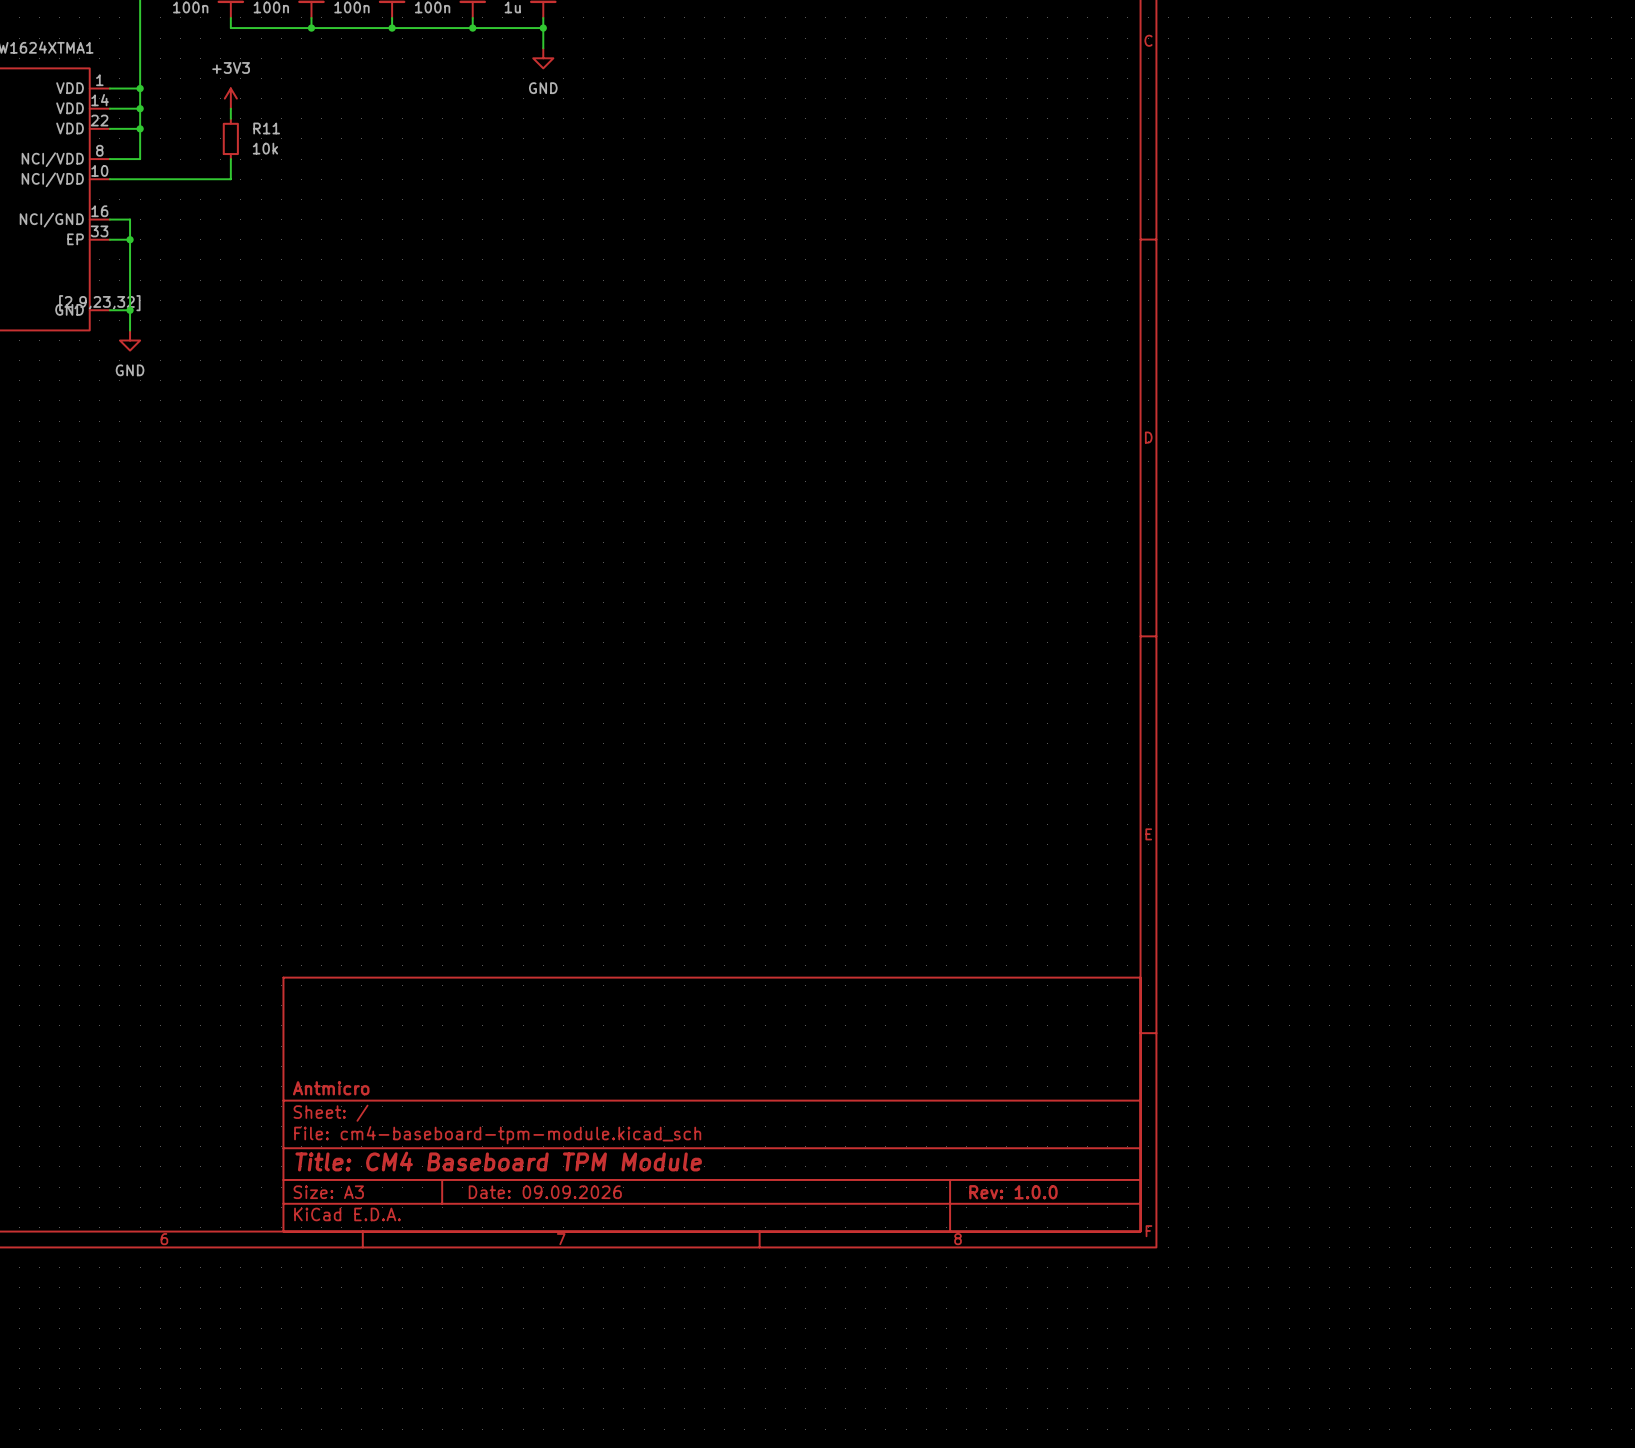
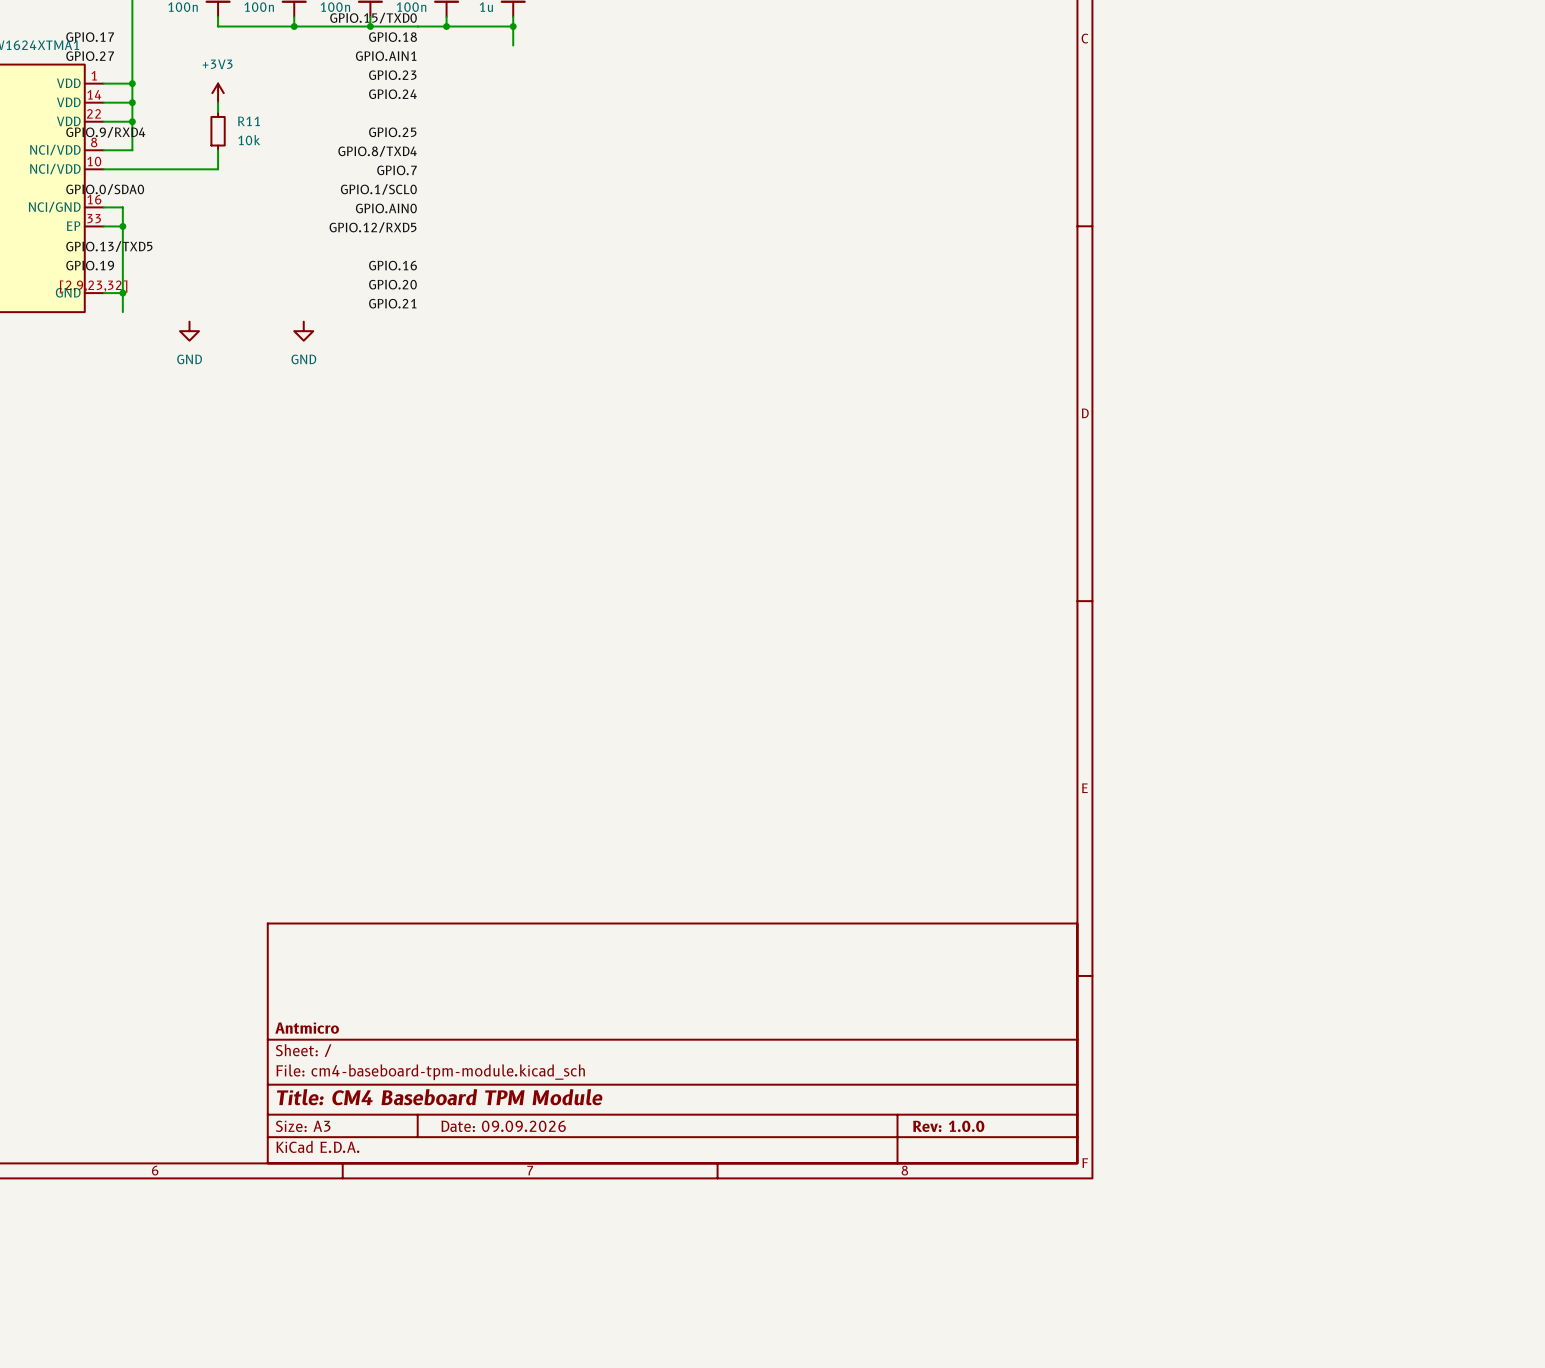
label: none -> GPIO.15/TXD0 (373, 18)
label: none -> GPIO.17 (90, 37)
label: none -> GPIO.18 (393, 37)
power symbol: GND (543, 58) -> none
label: none -> GPIO.27 (90, 56)
label: none -> GPIO.AIN1 (386, 56)
label: none -> GPIO.23 (392, 75)
label: none -> GPIO.24 (392, 94)
label: none -> GPIO.9/RXD4 (105, 132)
label: none -> GPIO.25 (392, 132)
label: none -> GPIO.8/TXD4 (377, 151)
label: none -> GPIO.7 (396, 170)
label: none -> GPIO.0/SDA0 (105, 189)
label: none -> GPIO.1/SCL0 (378, 189)
label: none -> GPIO.AIN0 (386, 208)
label: none -> GPIO.12/RXD5 (373, 227)
label: none -> GPIO.13/TXD5 (109, 246)
label: none -> GPIO.19 (90, 265)
label: none -> GPIO.16 (393, 265)
label: none -> GPIO.20 (392, 284)
label: none -> GPIO.21 (392, 303)
power symbol position: GND (130, 340) -> GND (189, 331)
power symbol: none -> GND (303, 331)

